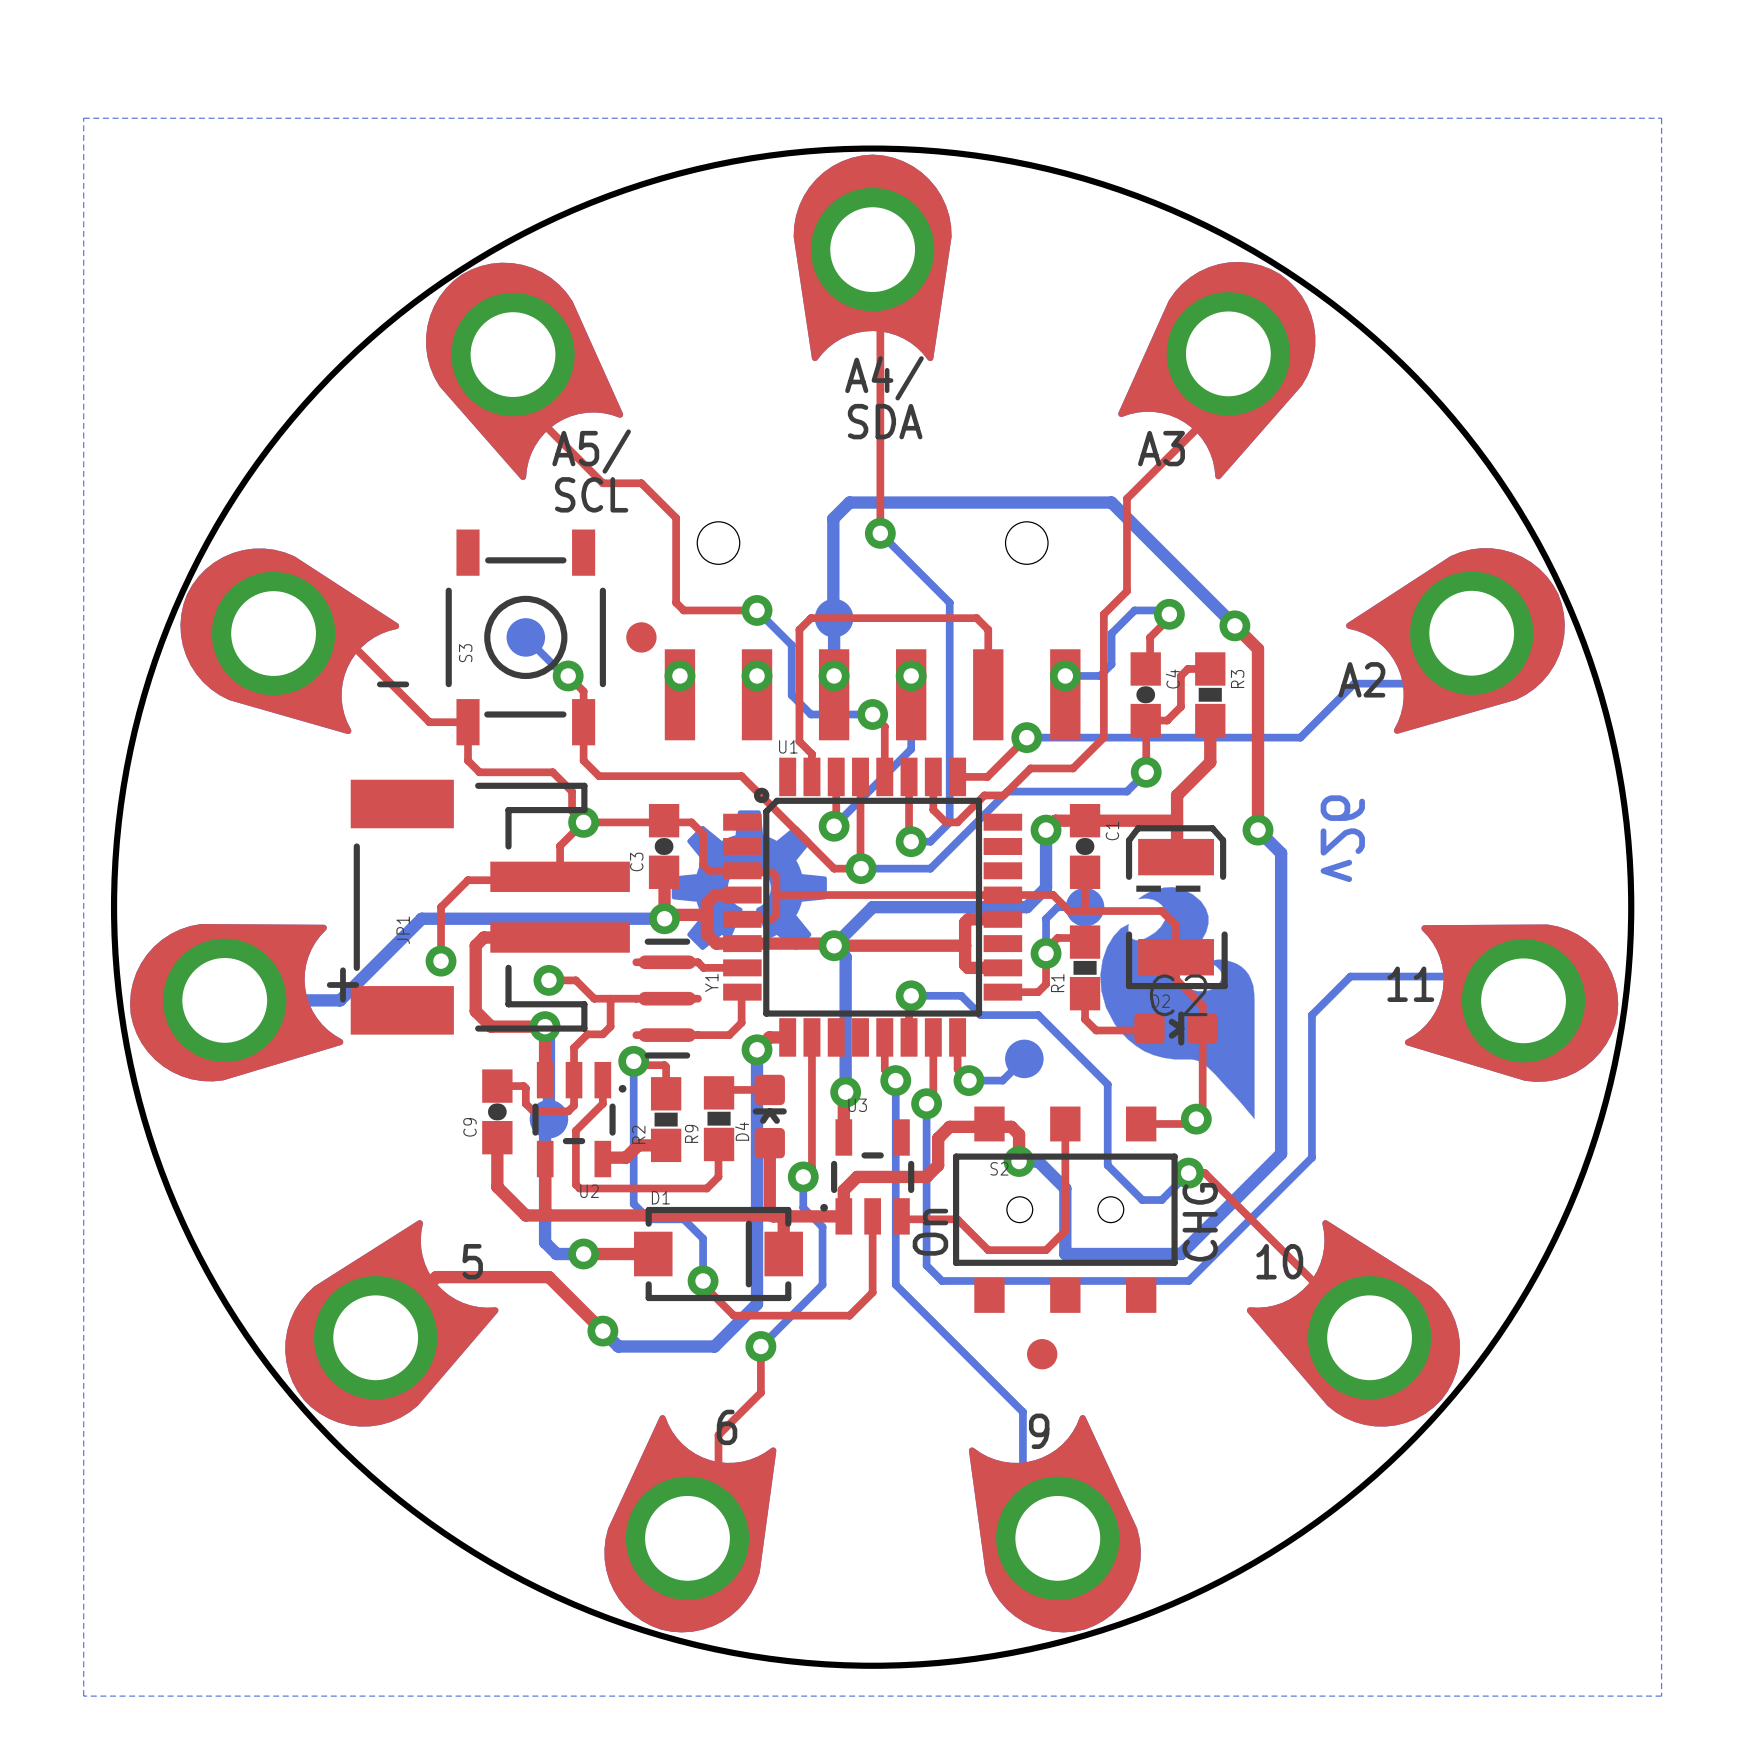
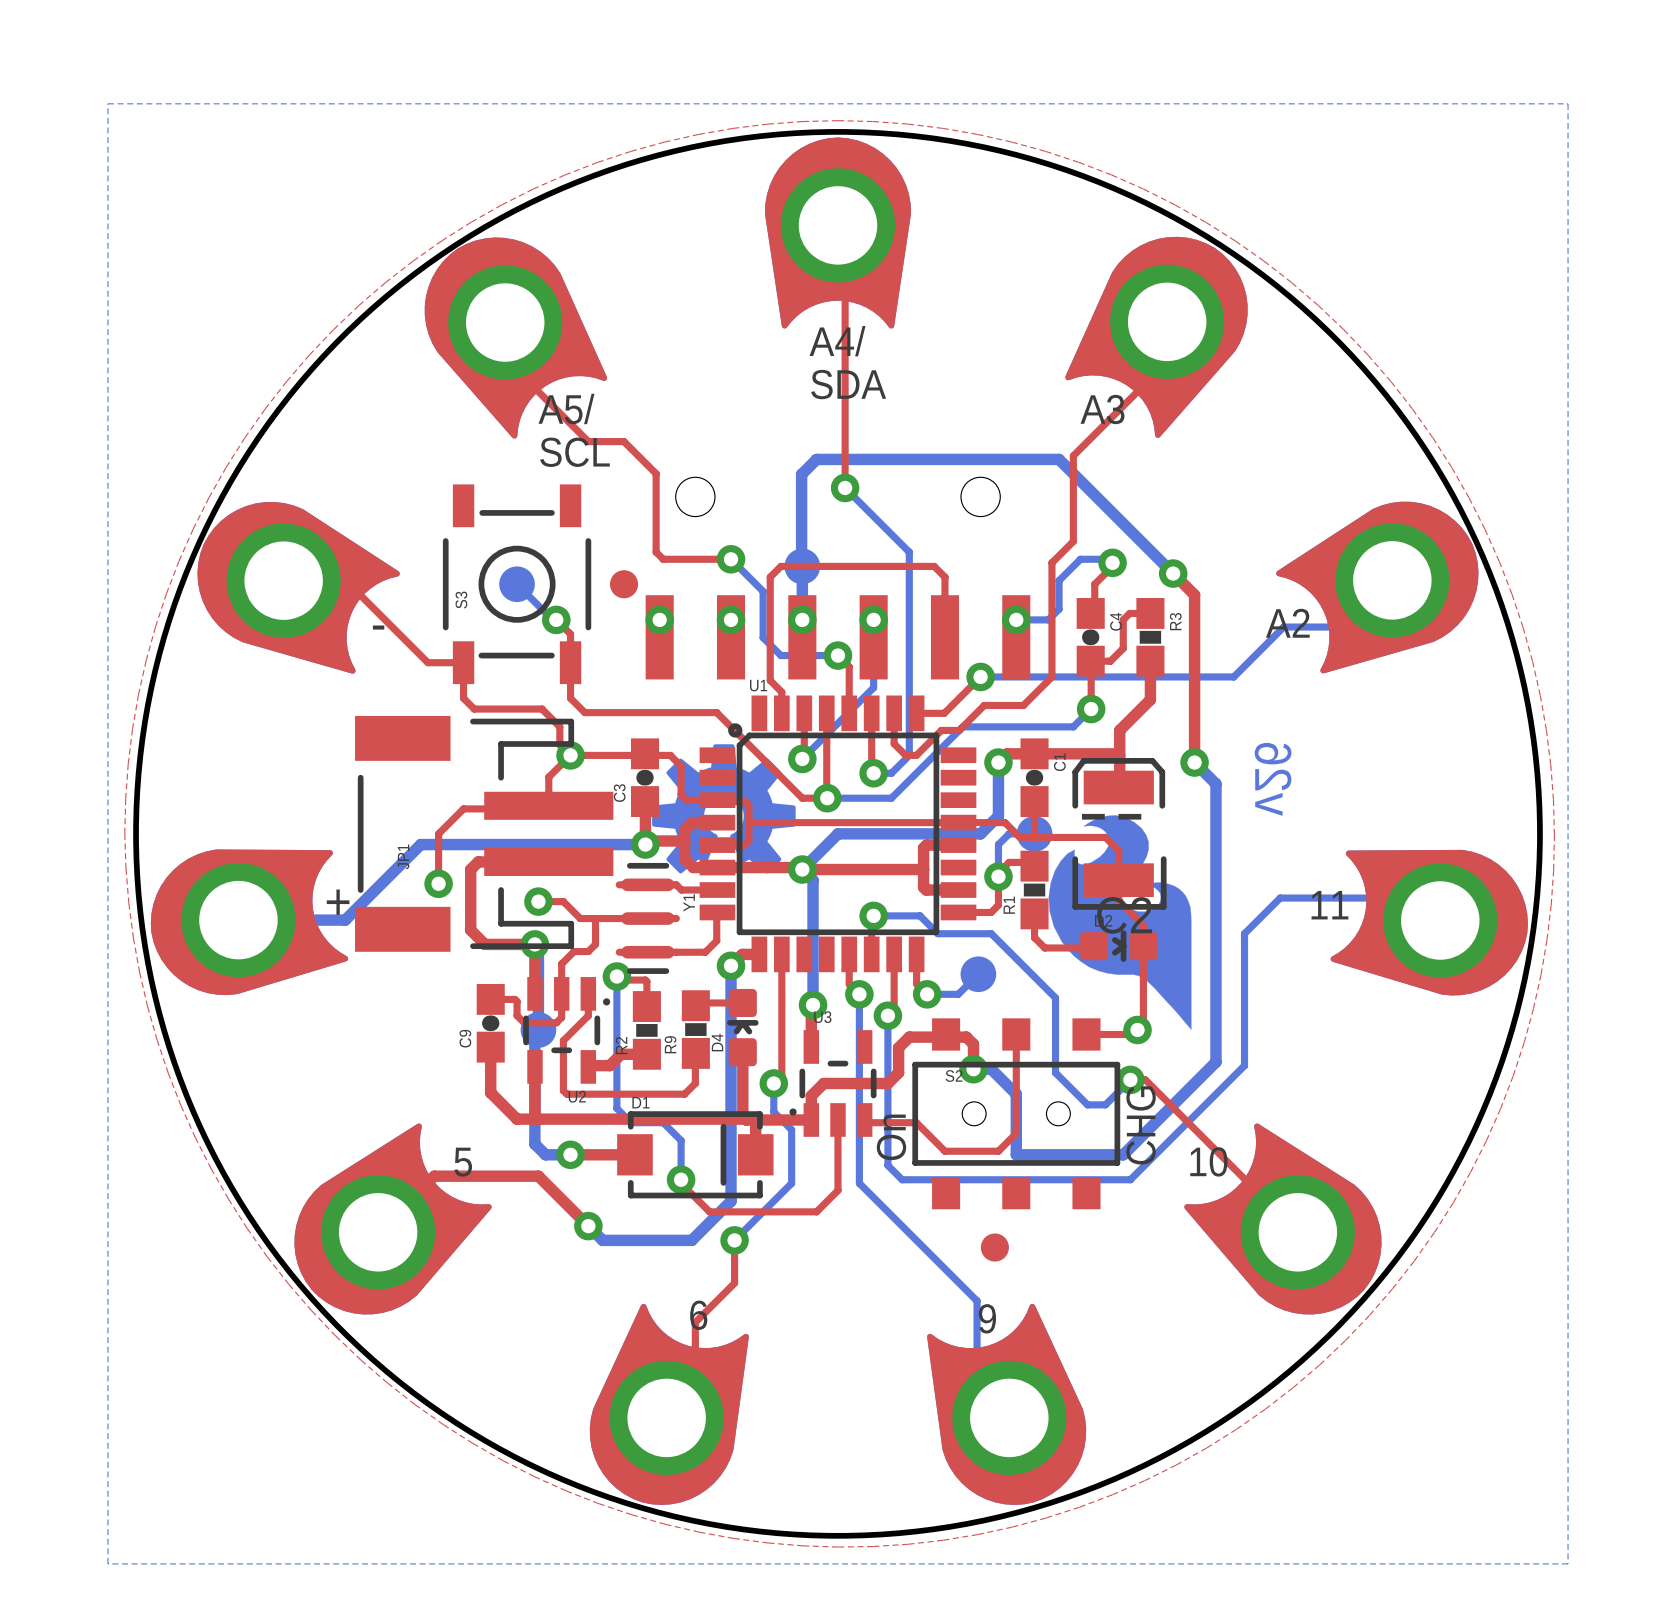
top zone outline: none -> (837, 120) (768, 124) (698, 134) (630, 151) (565, 174) (501, 204) (441, 240) (385, 282) (333, 329) (286, 381) (244, 437) (209, 497) (179, 560) (155, 626) (138, 694) (128, 763) (124, 833) (128, 903) (139, 972) (157, 1040) (180, 1105) (211, 1168) (247, 1228) (288, 1284) (335, 1336) (387, 1382) (443, 1424) (503, 1460) (566, 1490) (631, 1514) (699, 1532) (768, 1542) (837, 1547) (908, 1544) (977, 1534) (1045, 1518) (1112, 1494) (1175, 1465) (1236, 1429) (1292, 1387) (1345, 1340) (1392, 1288) (1434, 1232) (1470, 1172) (1500, 1108) (1524, 1042) (1541, 974) (1551, 905) (1554, 835) (1550, 764) (1540, 695) (1523, 627) (1499, 561) (1469, 498) (1432, 438) (1391, 381) (1343, 329) (1291, 282) (1235, 240) (1175, 204) (1111, 175) (1045, 151) (977, 134) (908, 124) (837, 120)

